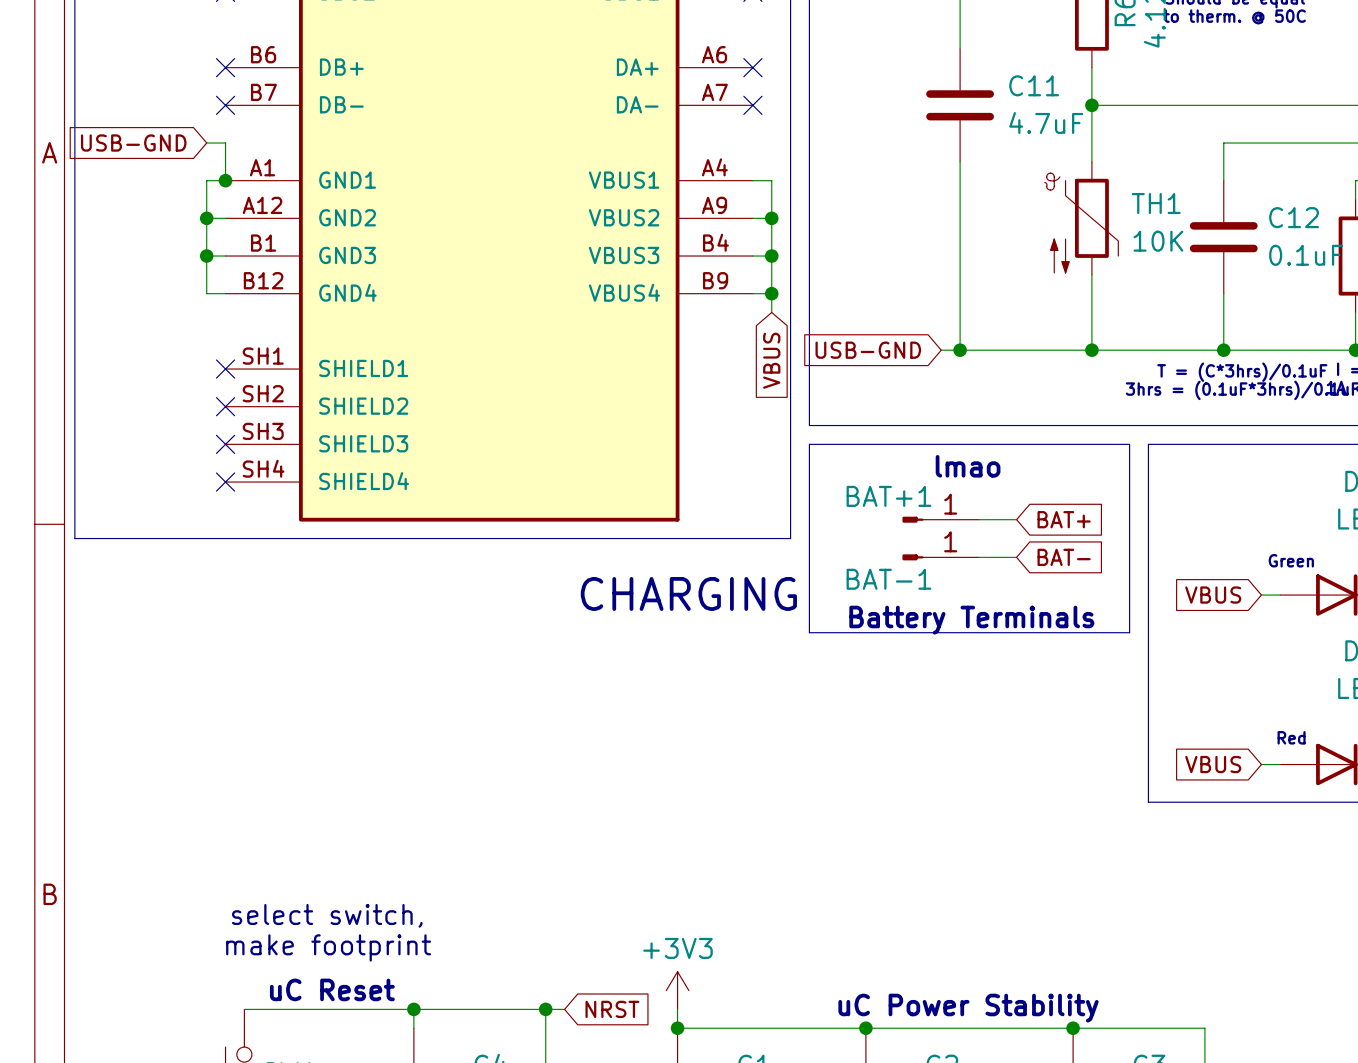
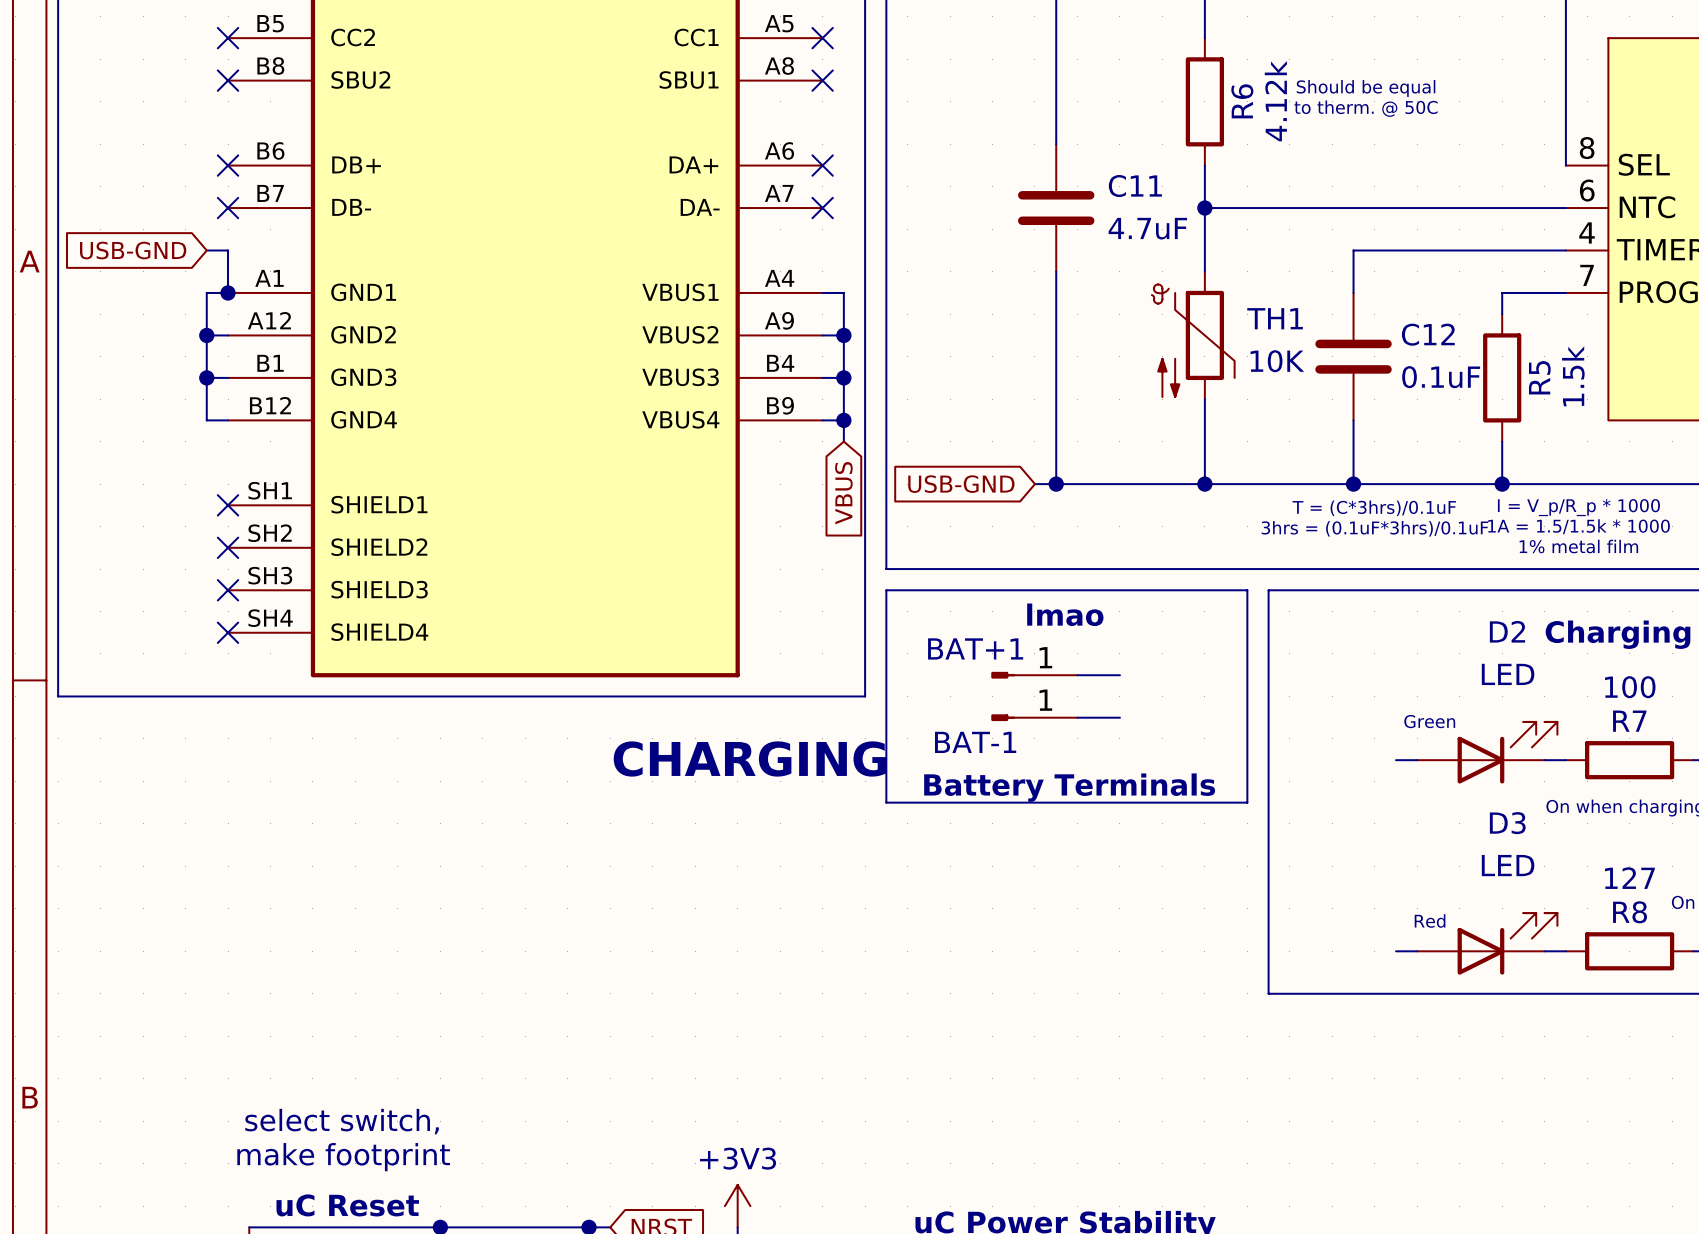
global label: BAT+ (1064, 519) -> none
global label: BAT- (1064, 557) -> none
global label: VBUS (1213, 595) -> none
global label: VBUS (1213, 764) -> none

